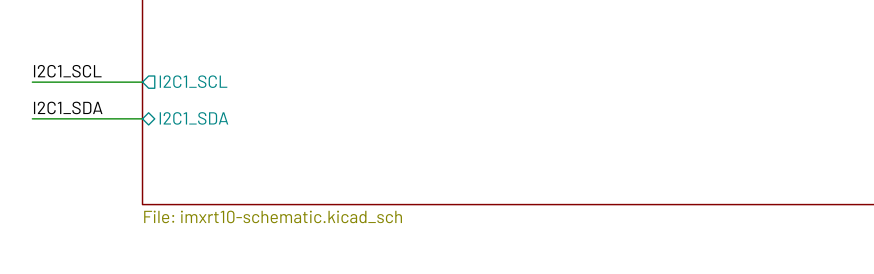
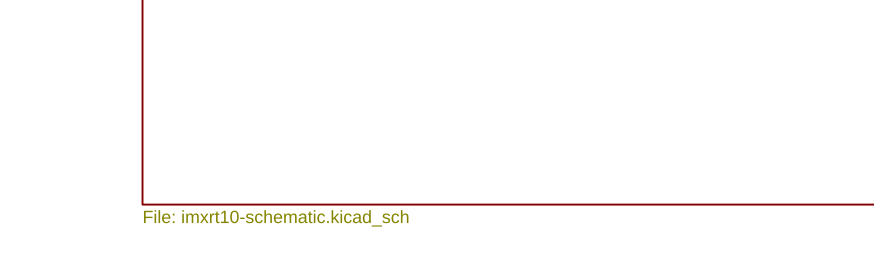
label: I2C1_SCL (67, 71) -> none
sheet pin: I2C1_SCL (193, 81) -> none
wire: (32, 82) (142, 82) -> none
label: I2C1_SDA (68, 107) -> none
wire: (32, 118) (142, 118) -> none
sheet pin: I2C1_SDA (193, 118) -> none

